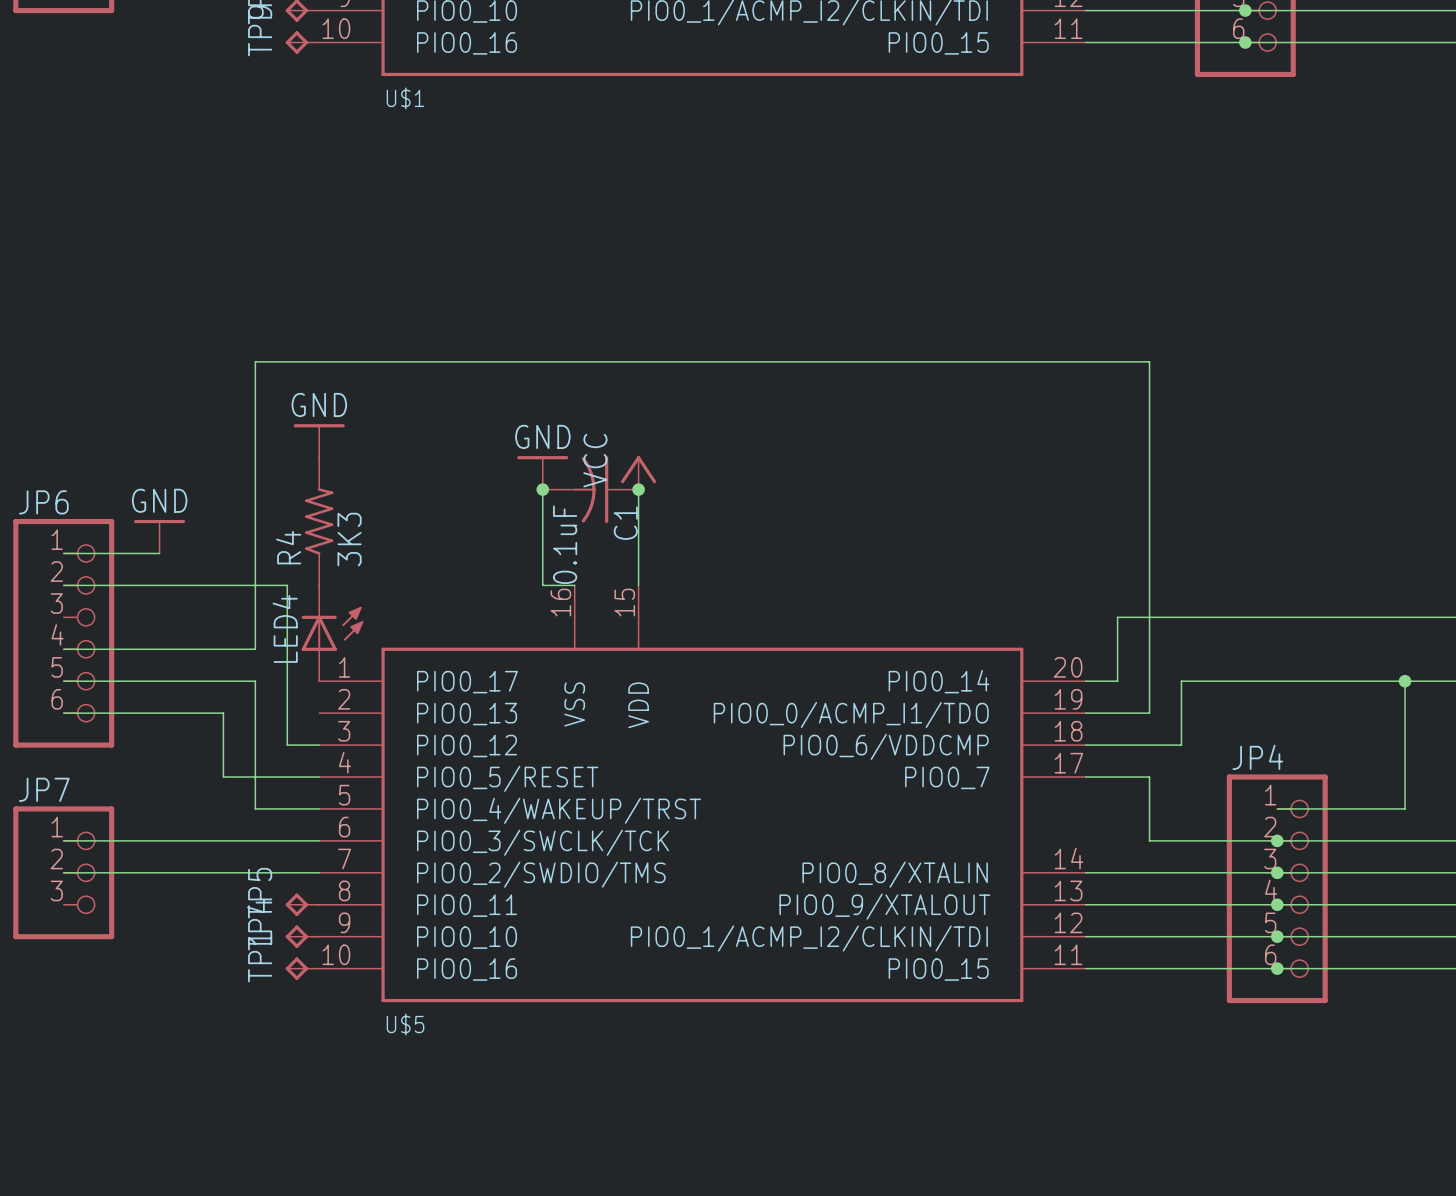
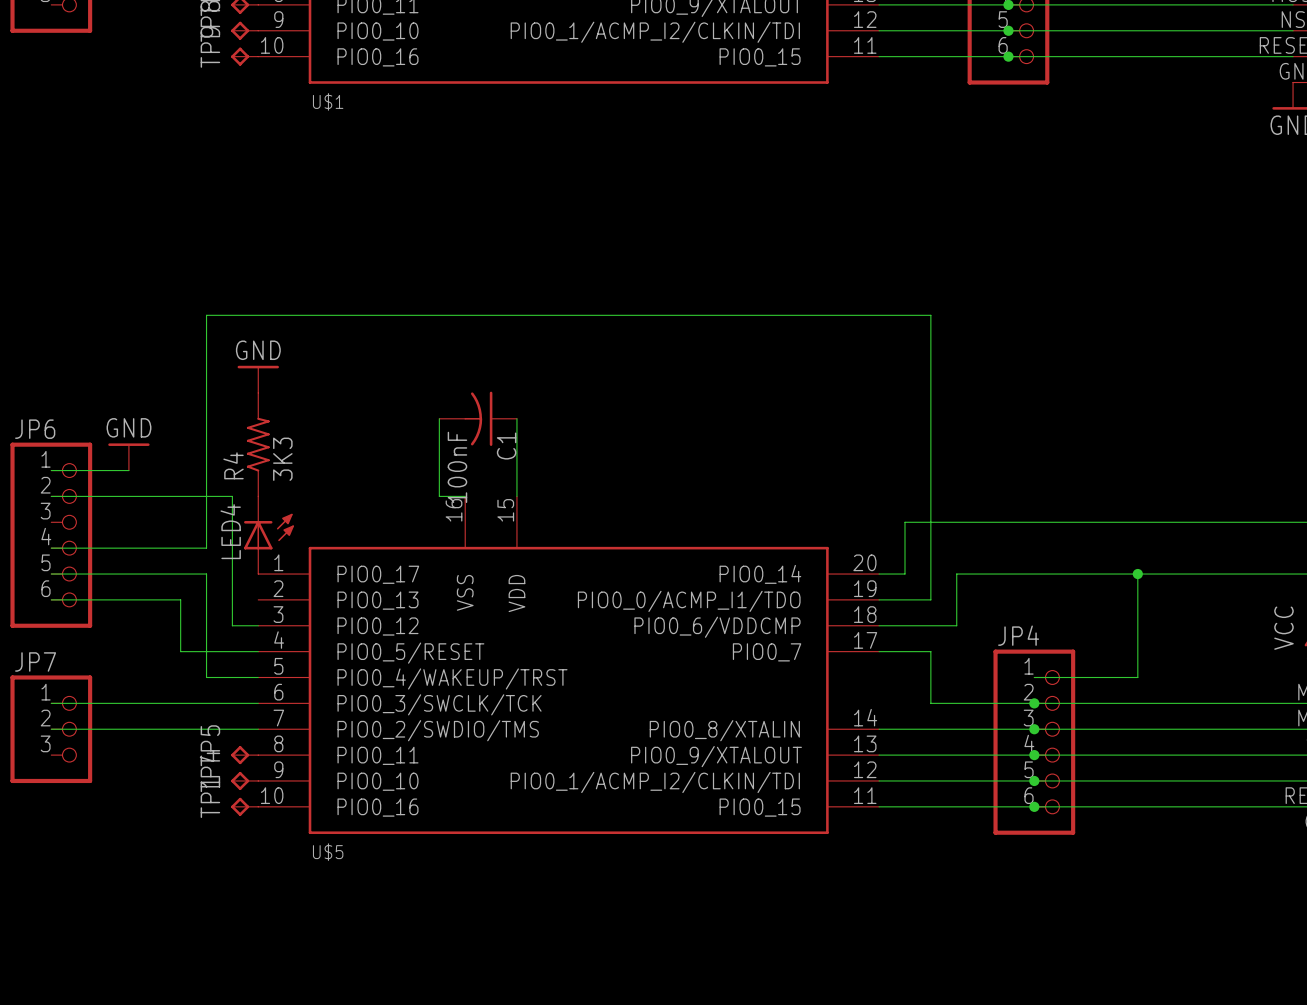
power symbol: GND (542, 472) -> none
power symbol: VCC (638, 472) -> none
junction: (542, 489) -> none
junction: (638, 489) -> none
C1 value: 0.1uF (565, 544) -> 100nF (457, 467)

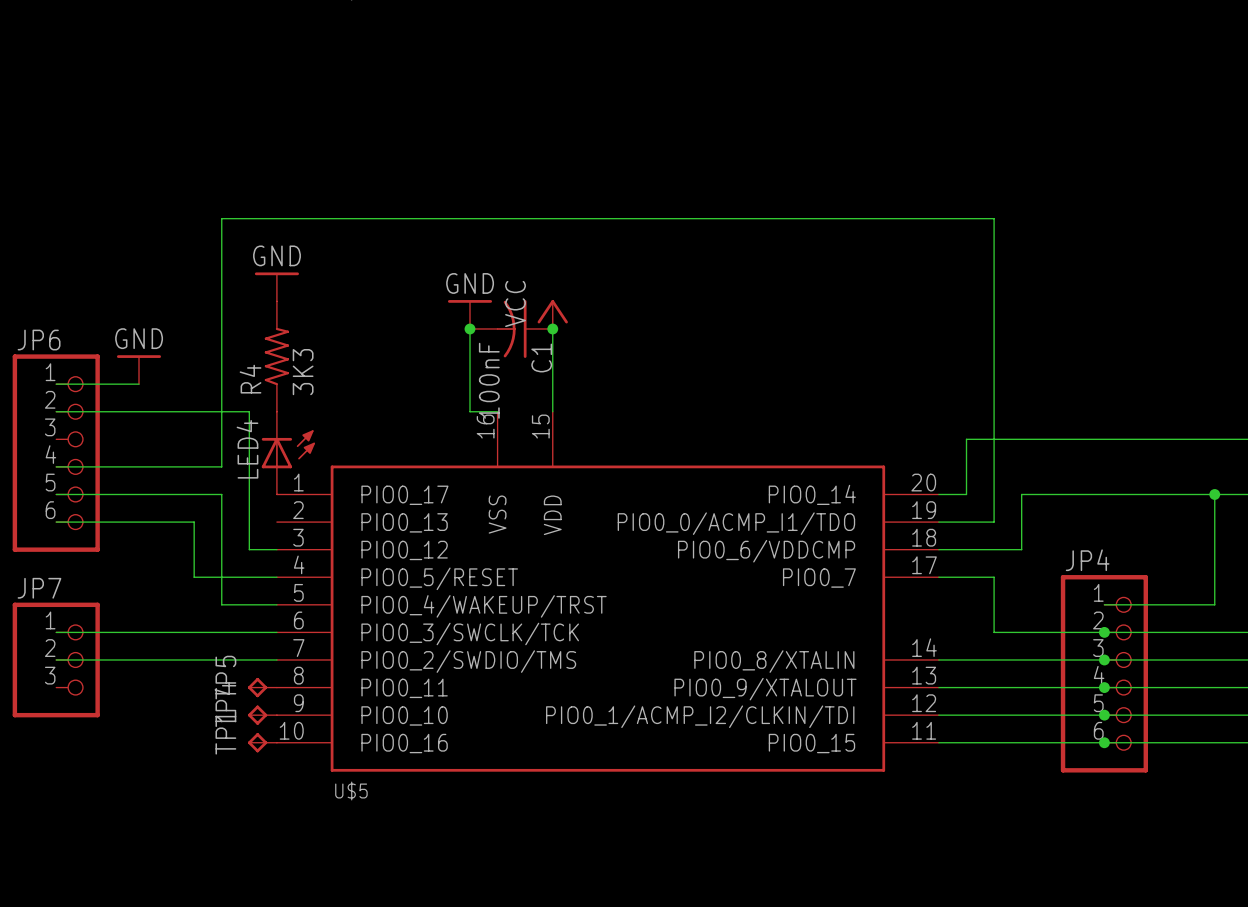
power symbol: none -> GND (470, 314)
power symbol: none -> VCC (552, 314)
junction: none -> (470, 328)
junction: none -> (552, 328)

